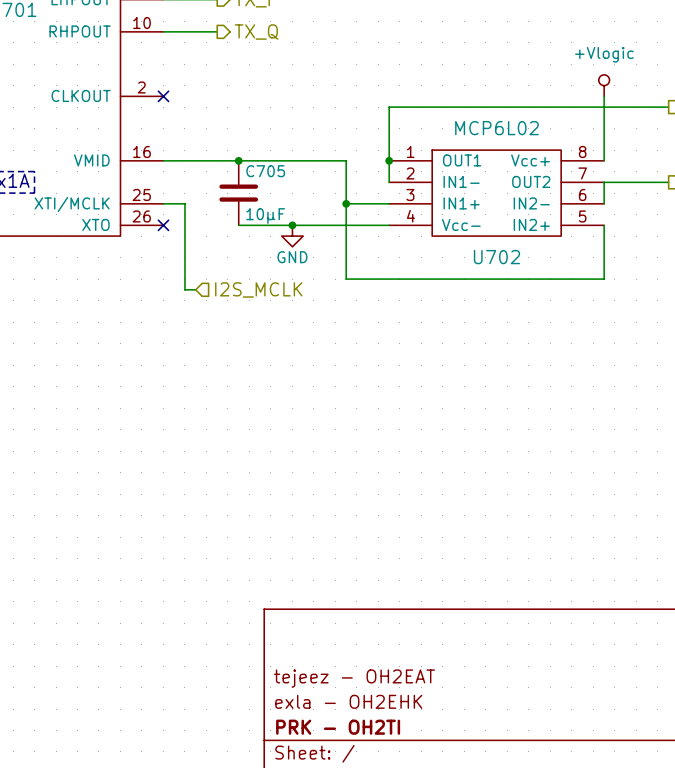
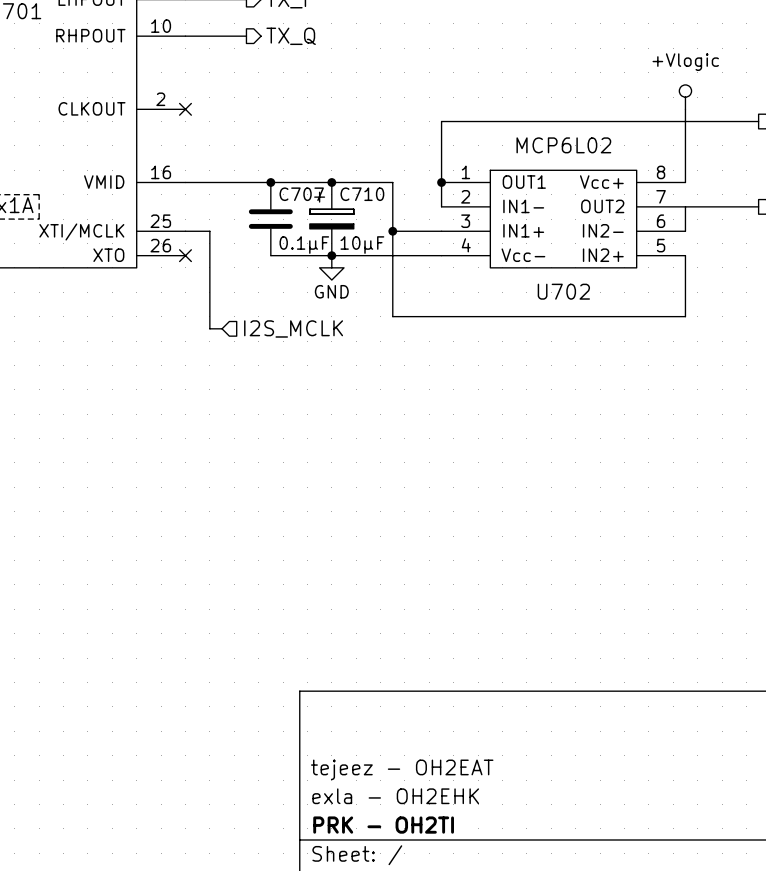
junction: none -> (331, 182)
C705 name: C705 (265, 171) -> C707 (301, 194)
C710: none -> 10µF (331, 219)
C705 value: 10µF (265, 215) -> 0.1µF (304, 245)

